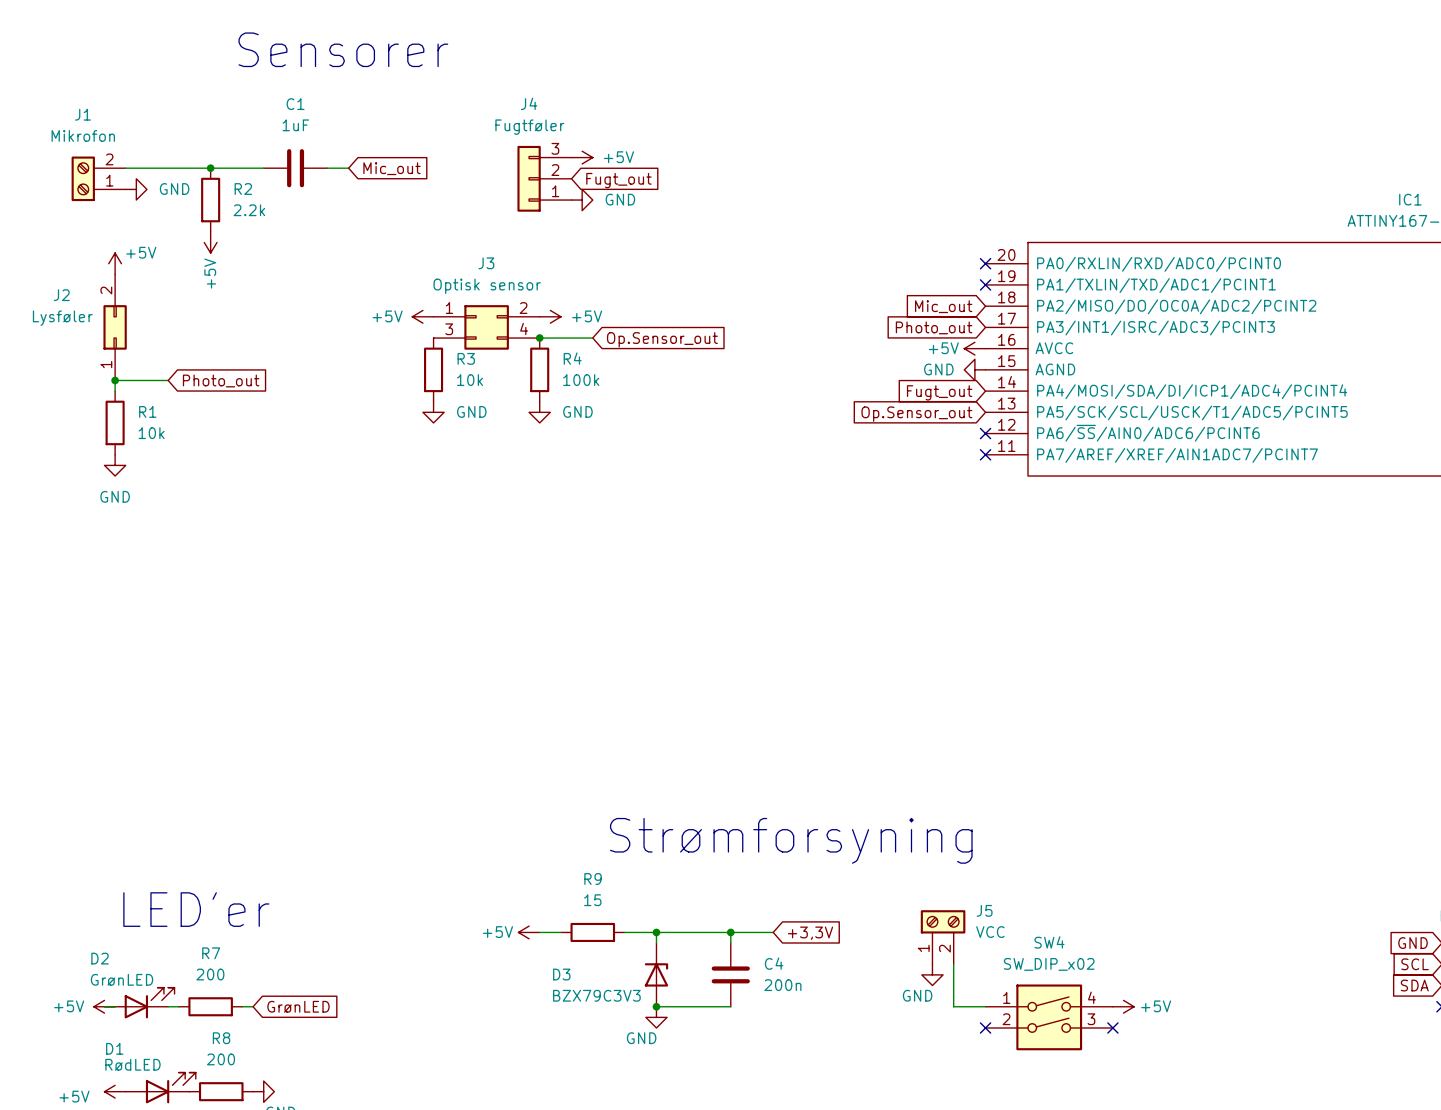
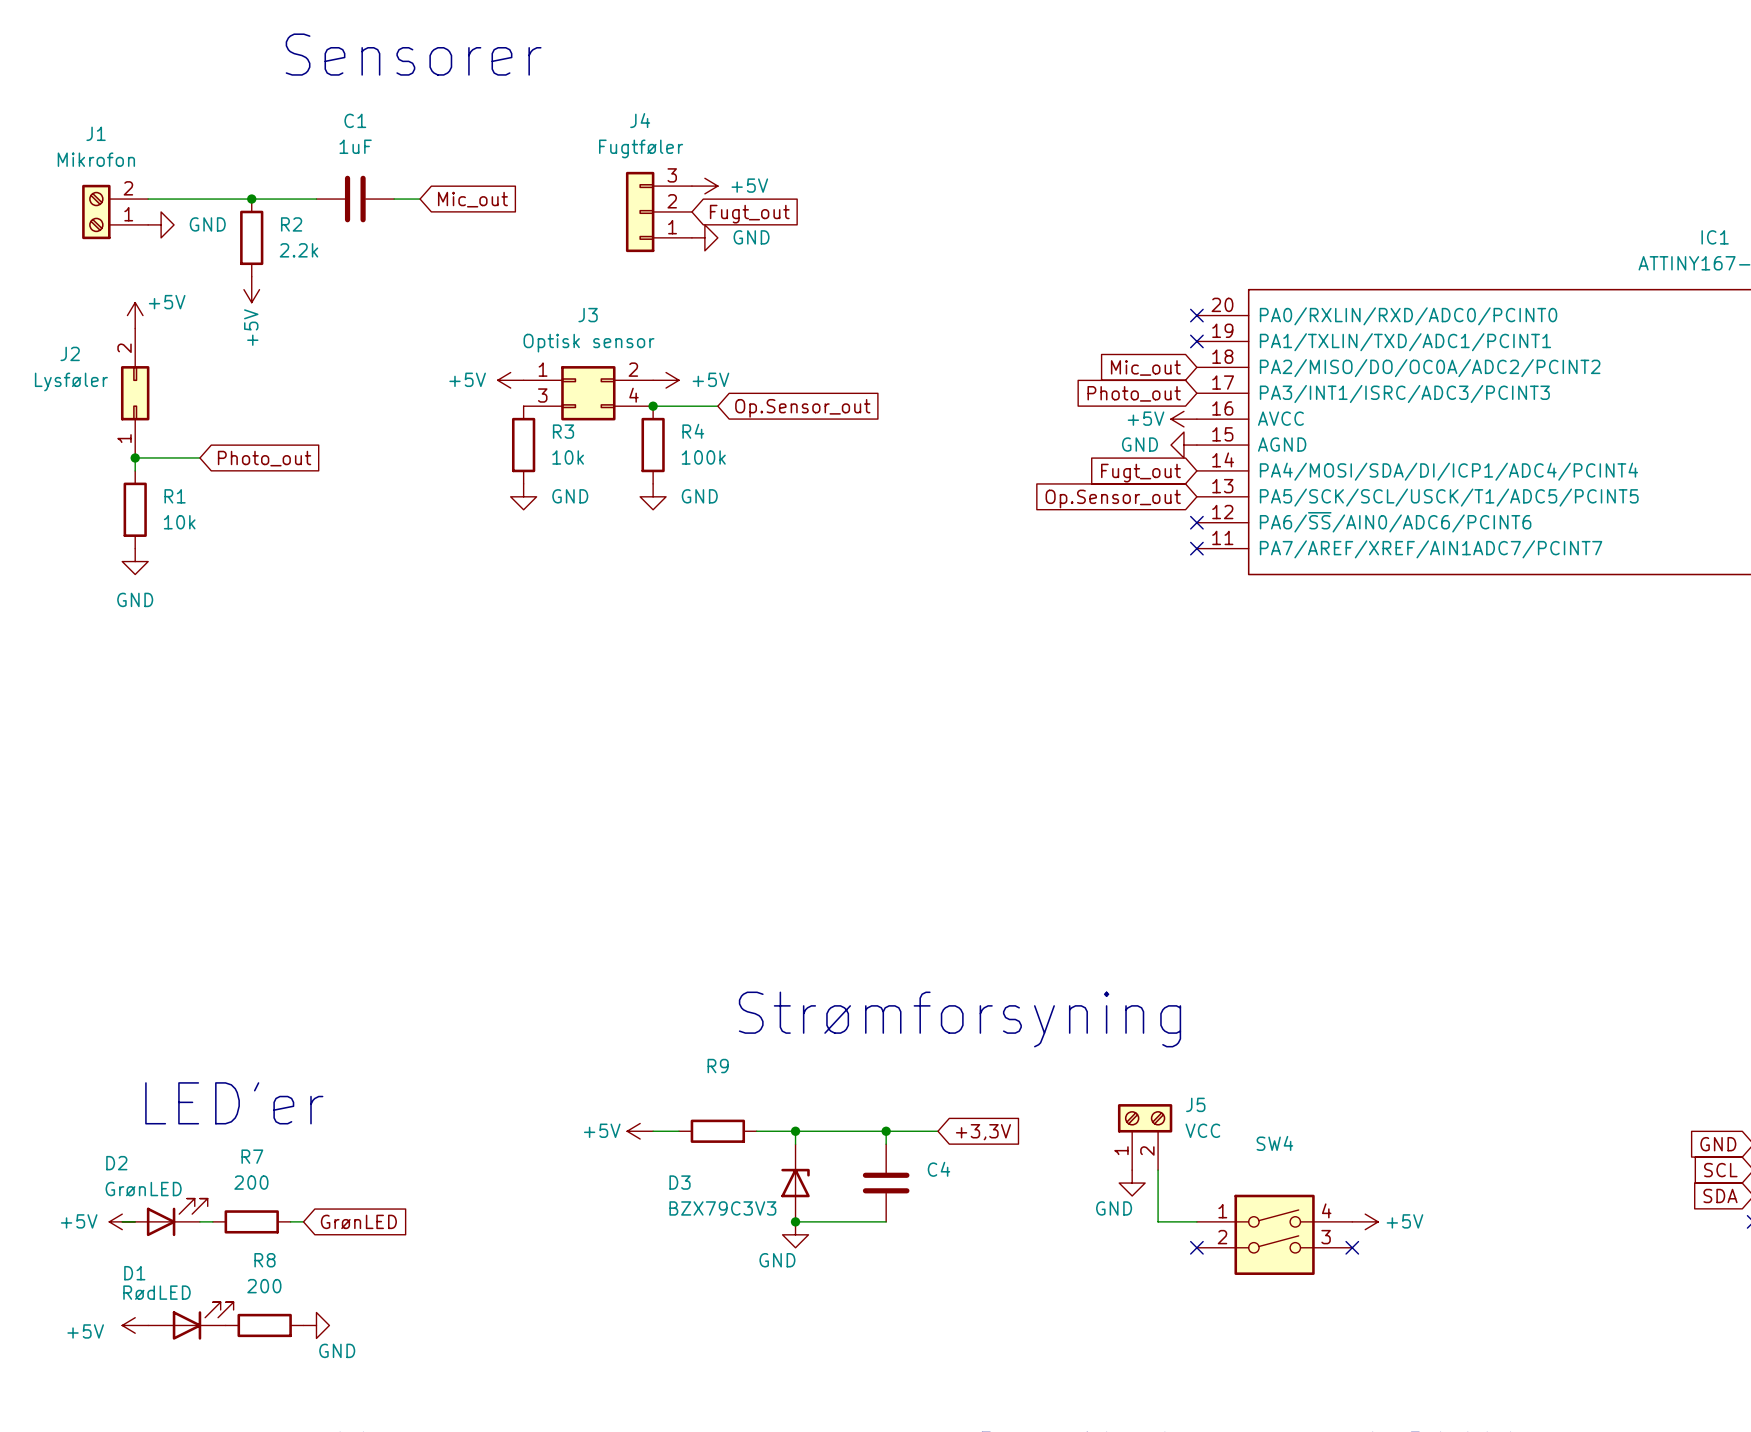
R9 value: 15 (592, 900) -> none
SW4 value: SW_DIP_x02 (1049, 964) -> none
C4 value: 200n (782, 985) -> none

